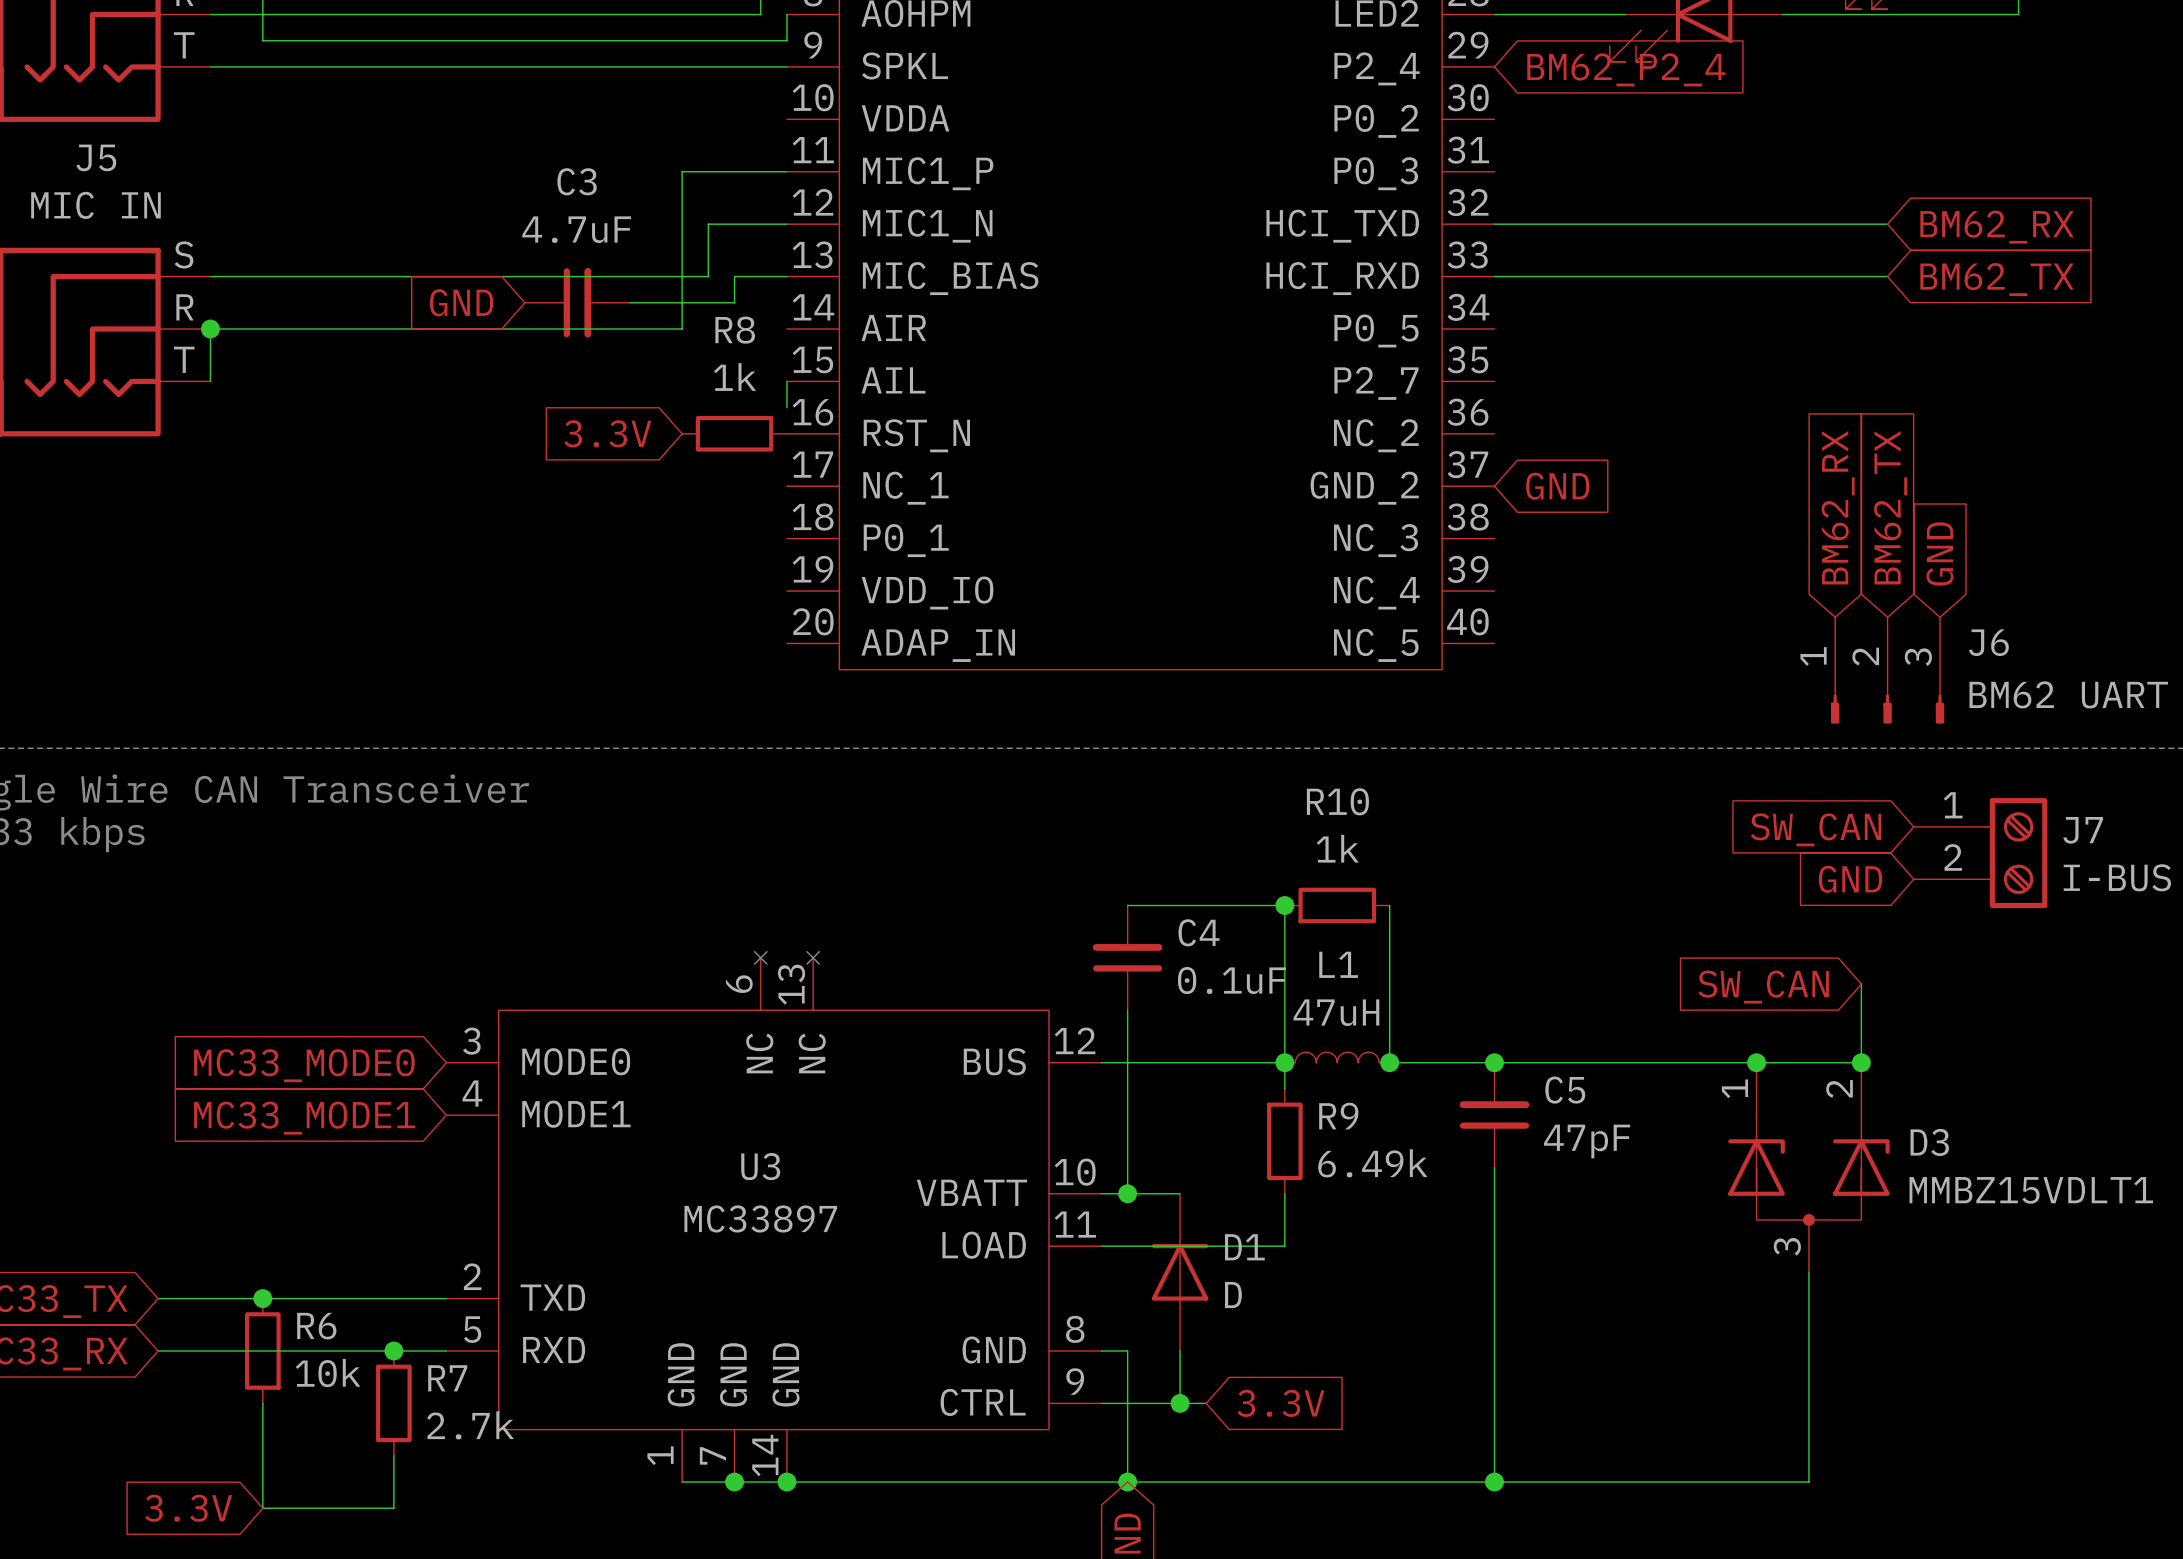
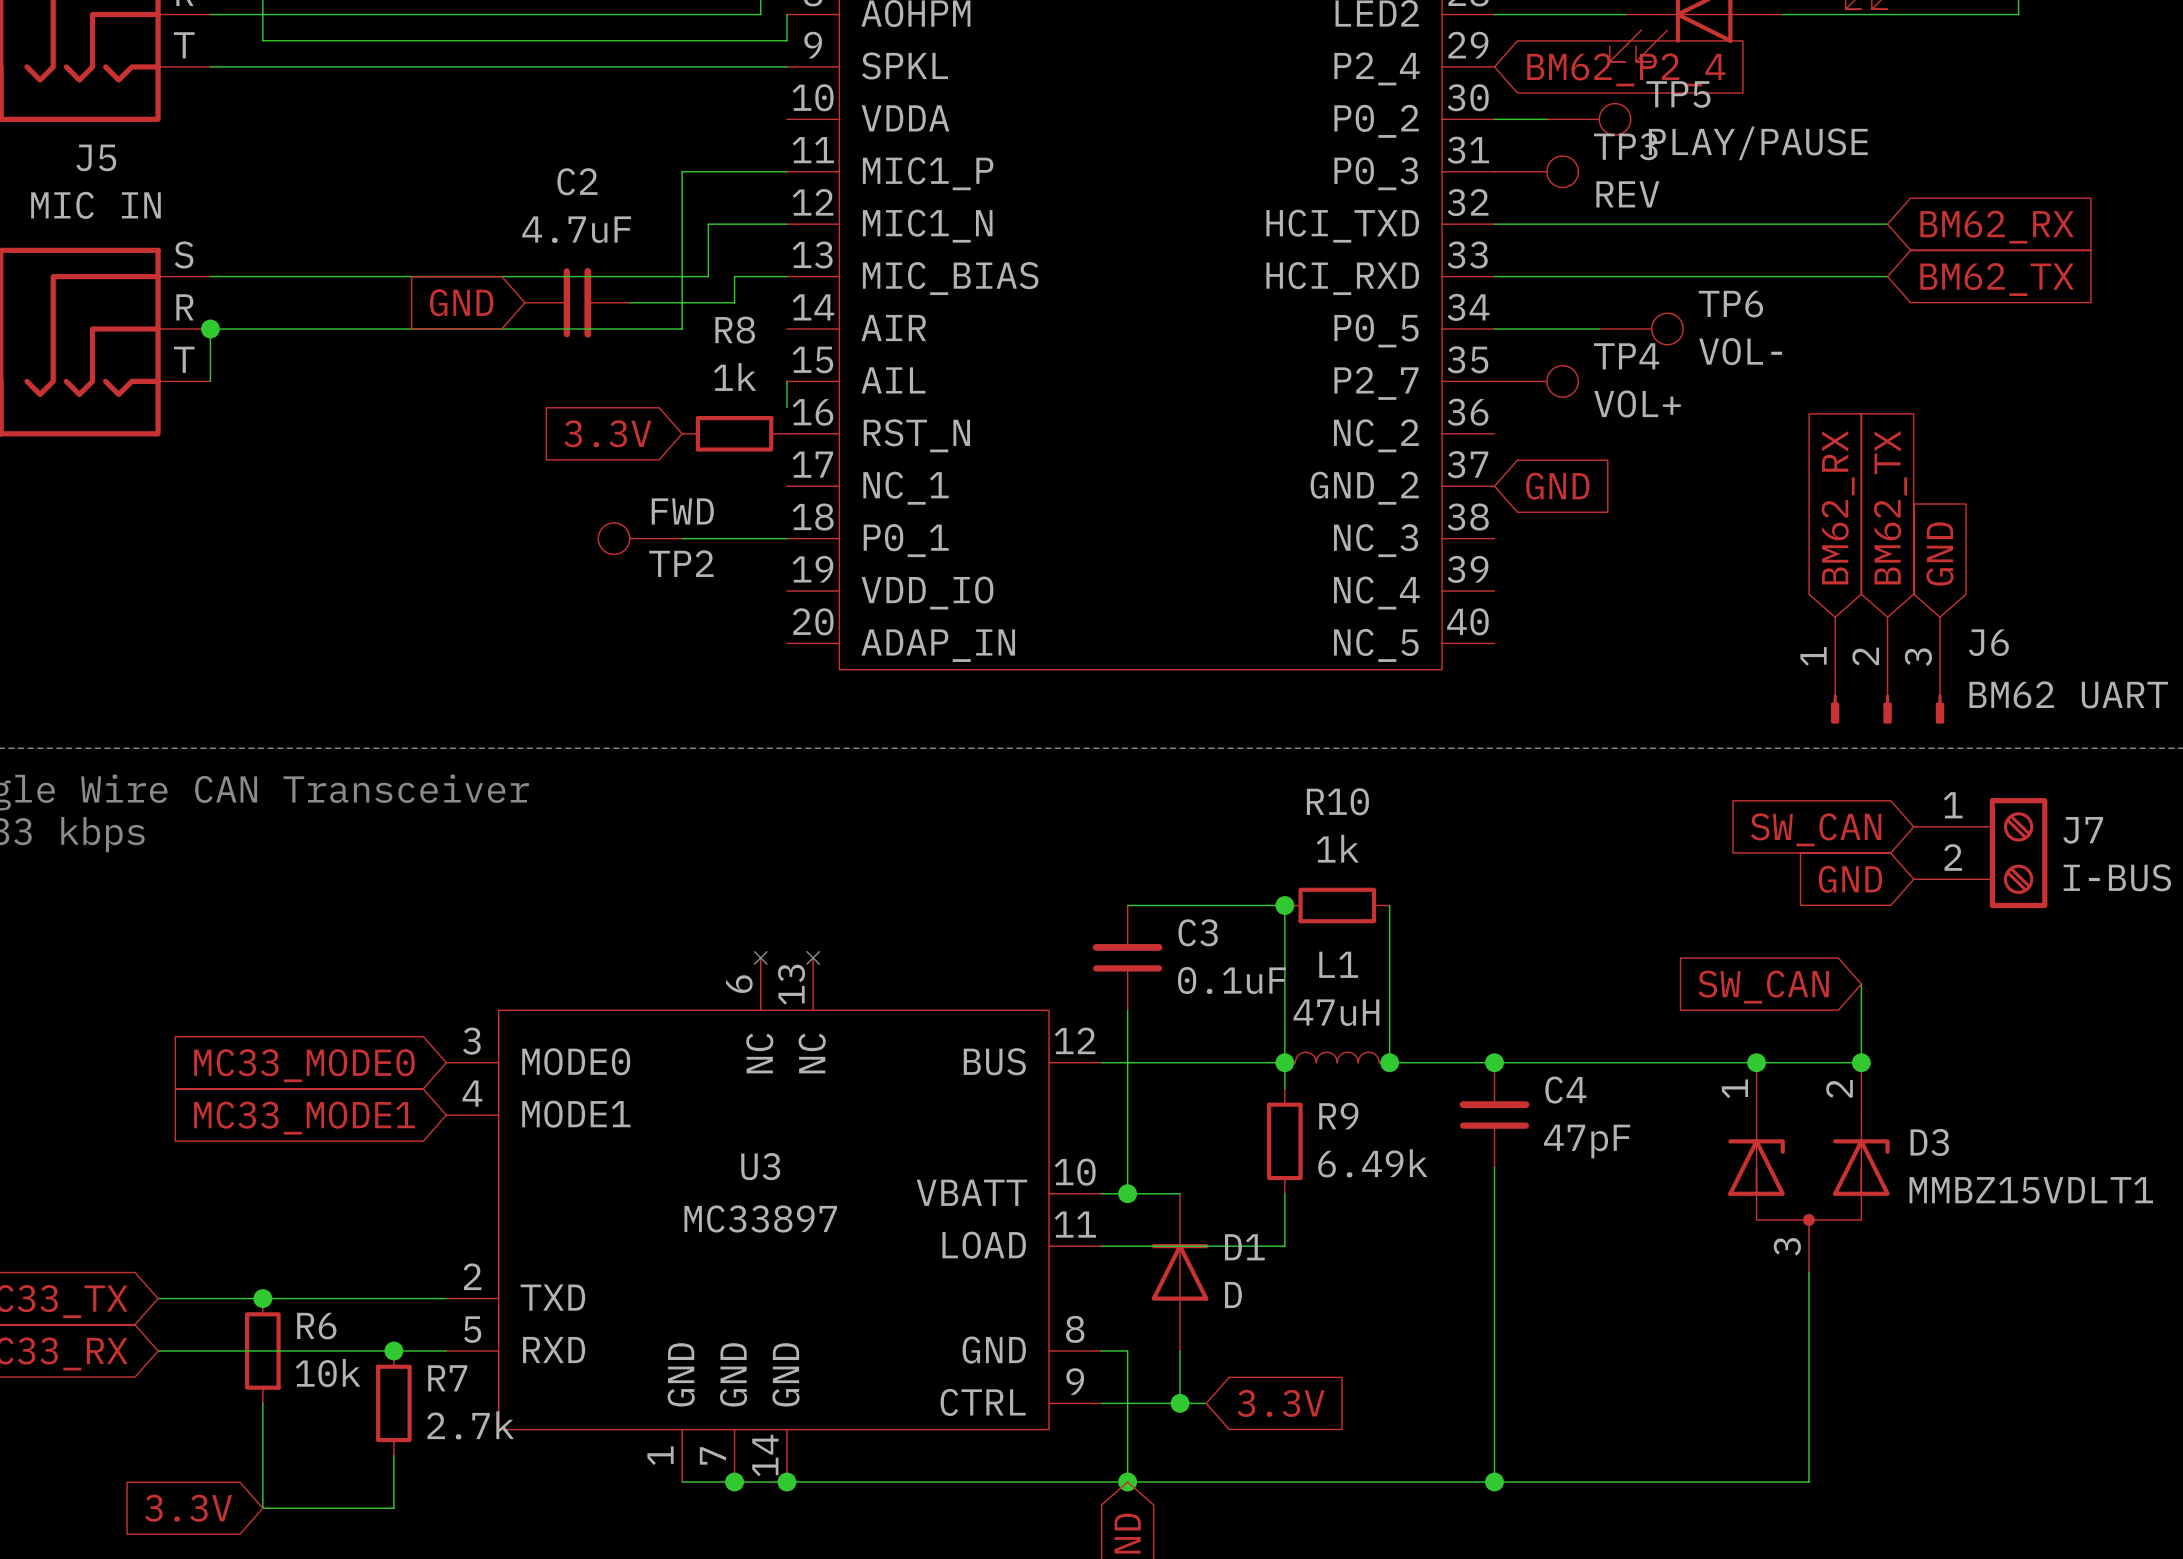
wire: none -> (1494, 119) (1546, 119)
TP5: none -> PLAY/PAUSE (1588, 119)
TP3: none -> REV (1536, 171)
C3 name: C3 (577, 181) -> C2 (577, 181)
wire: none -> (1494, 328) (1599, 328)
TP6: none -> VOL- (1641, 328)
TP4: none -> VOL+ (1536, 381)
TP2: none -> FWD (640, 538)
wire: none -> (682, 538) (786, 538)
C4 name: C4 (1198, 932) -> C3 (1198, 932)
C5 name: C5 (1565, 1090) -> C4 (1565, 1090)

